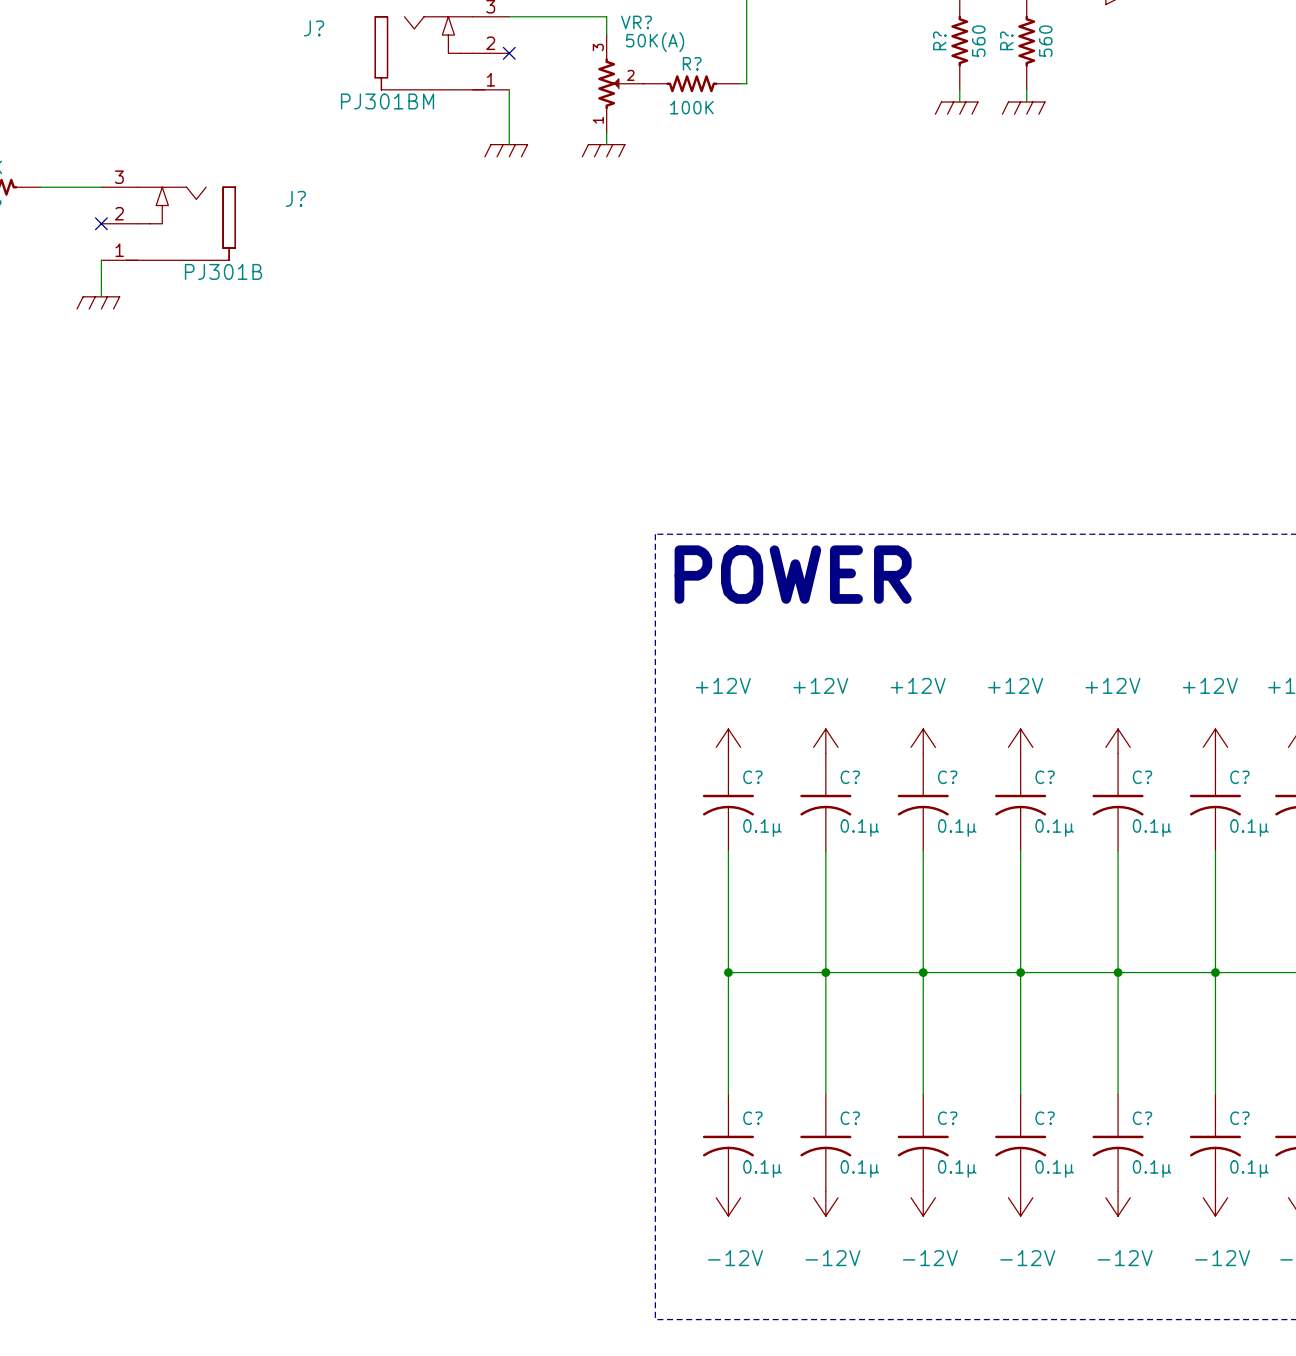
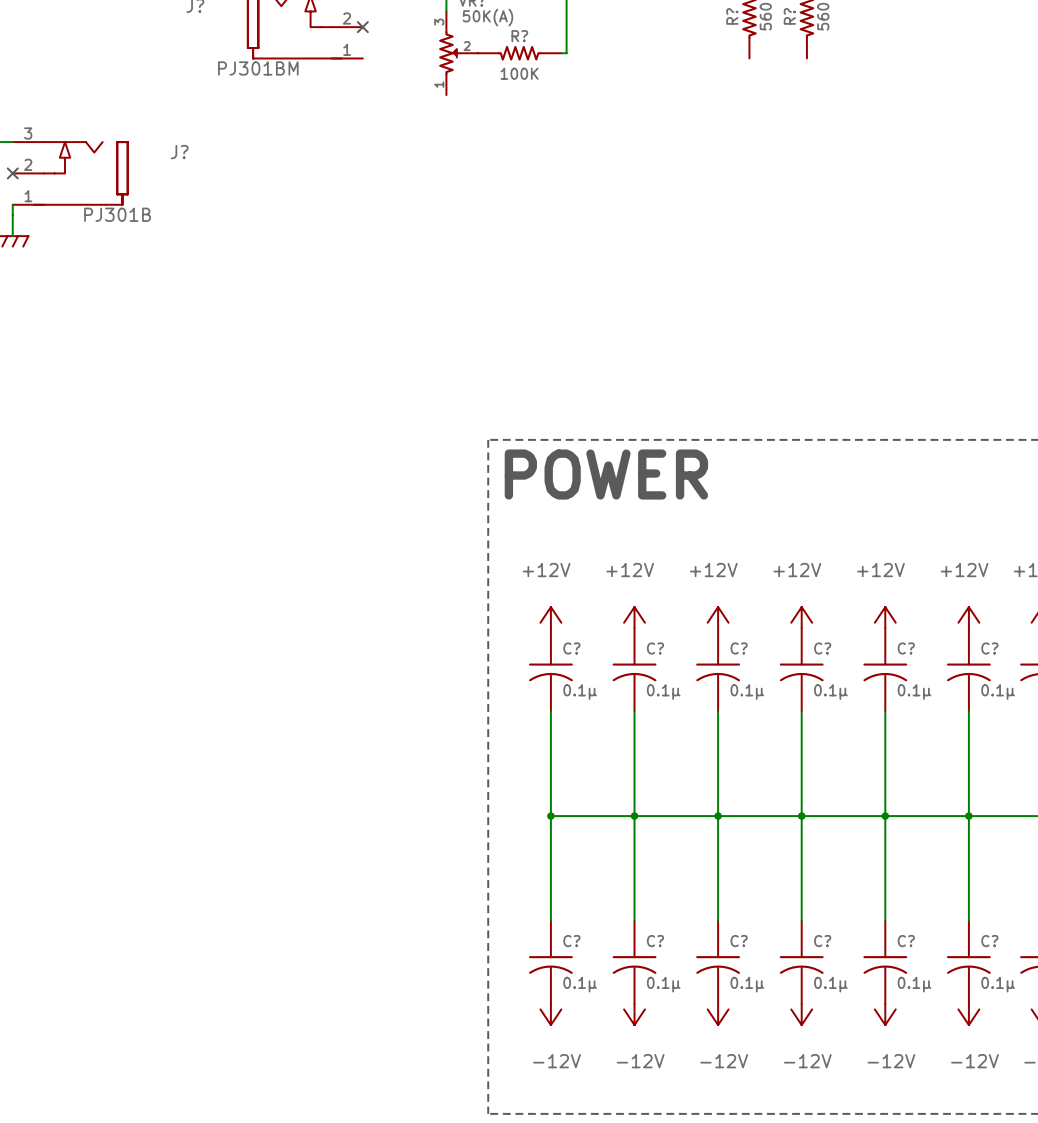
wire: (509, 89) (509, 144) -> none
wire: (959, 89) (959, 102) -> none
wire: (1026, 89) (1026, 102) -> none
power symbol: (956, 108) -> none
power symbol: (1023, 108) -> none
wire: (606, 132) (606, 144) -> none
power symbol: (506, 150) -> none
power symbol: (603, 150) -> none

